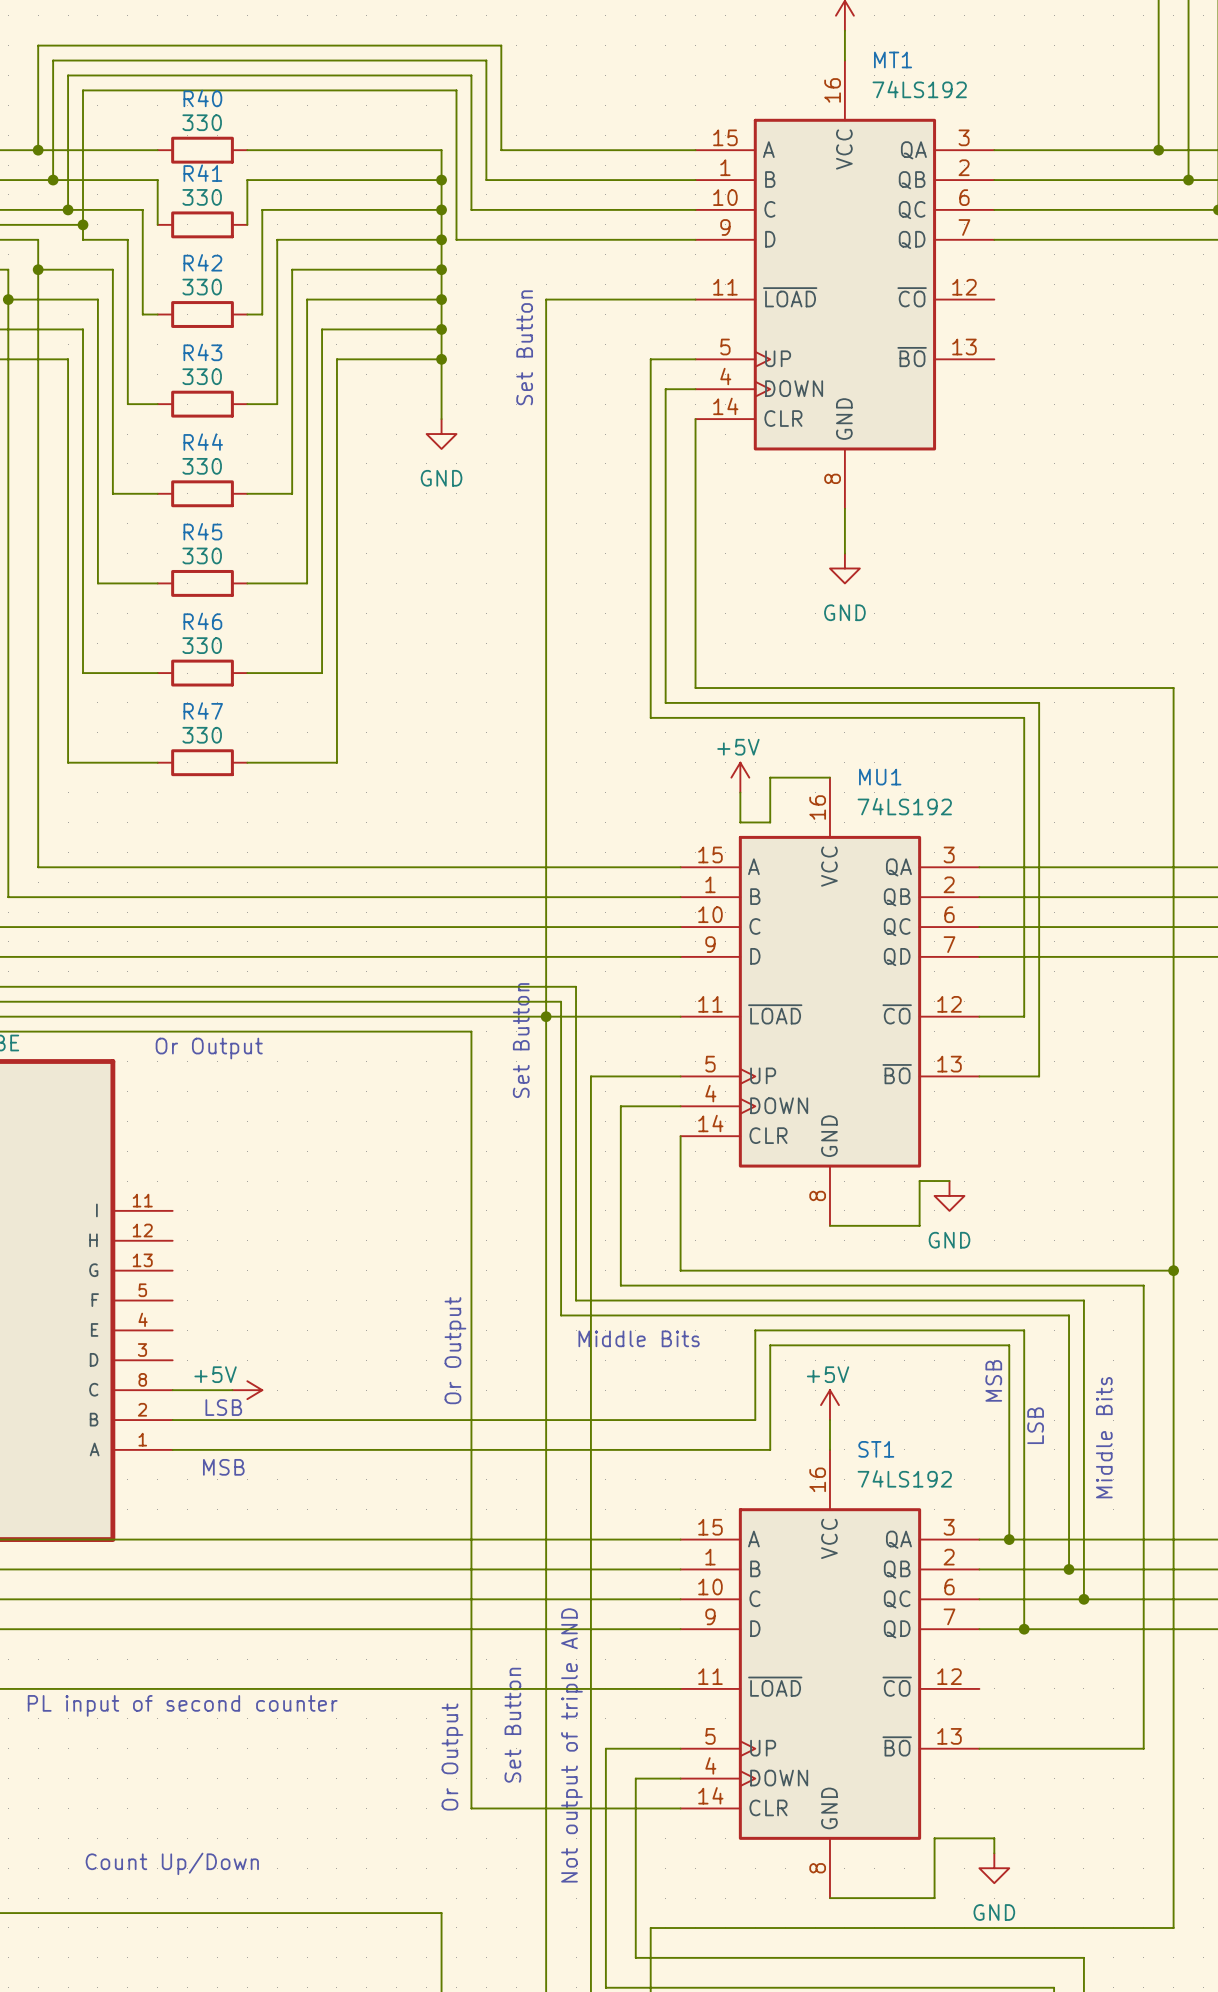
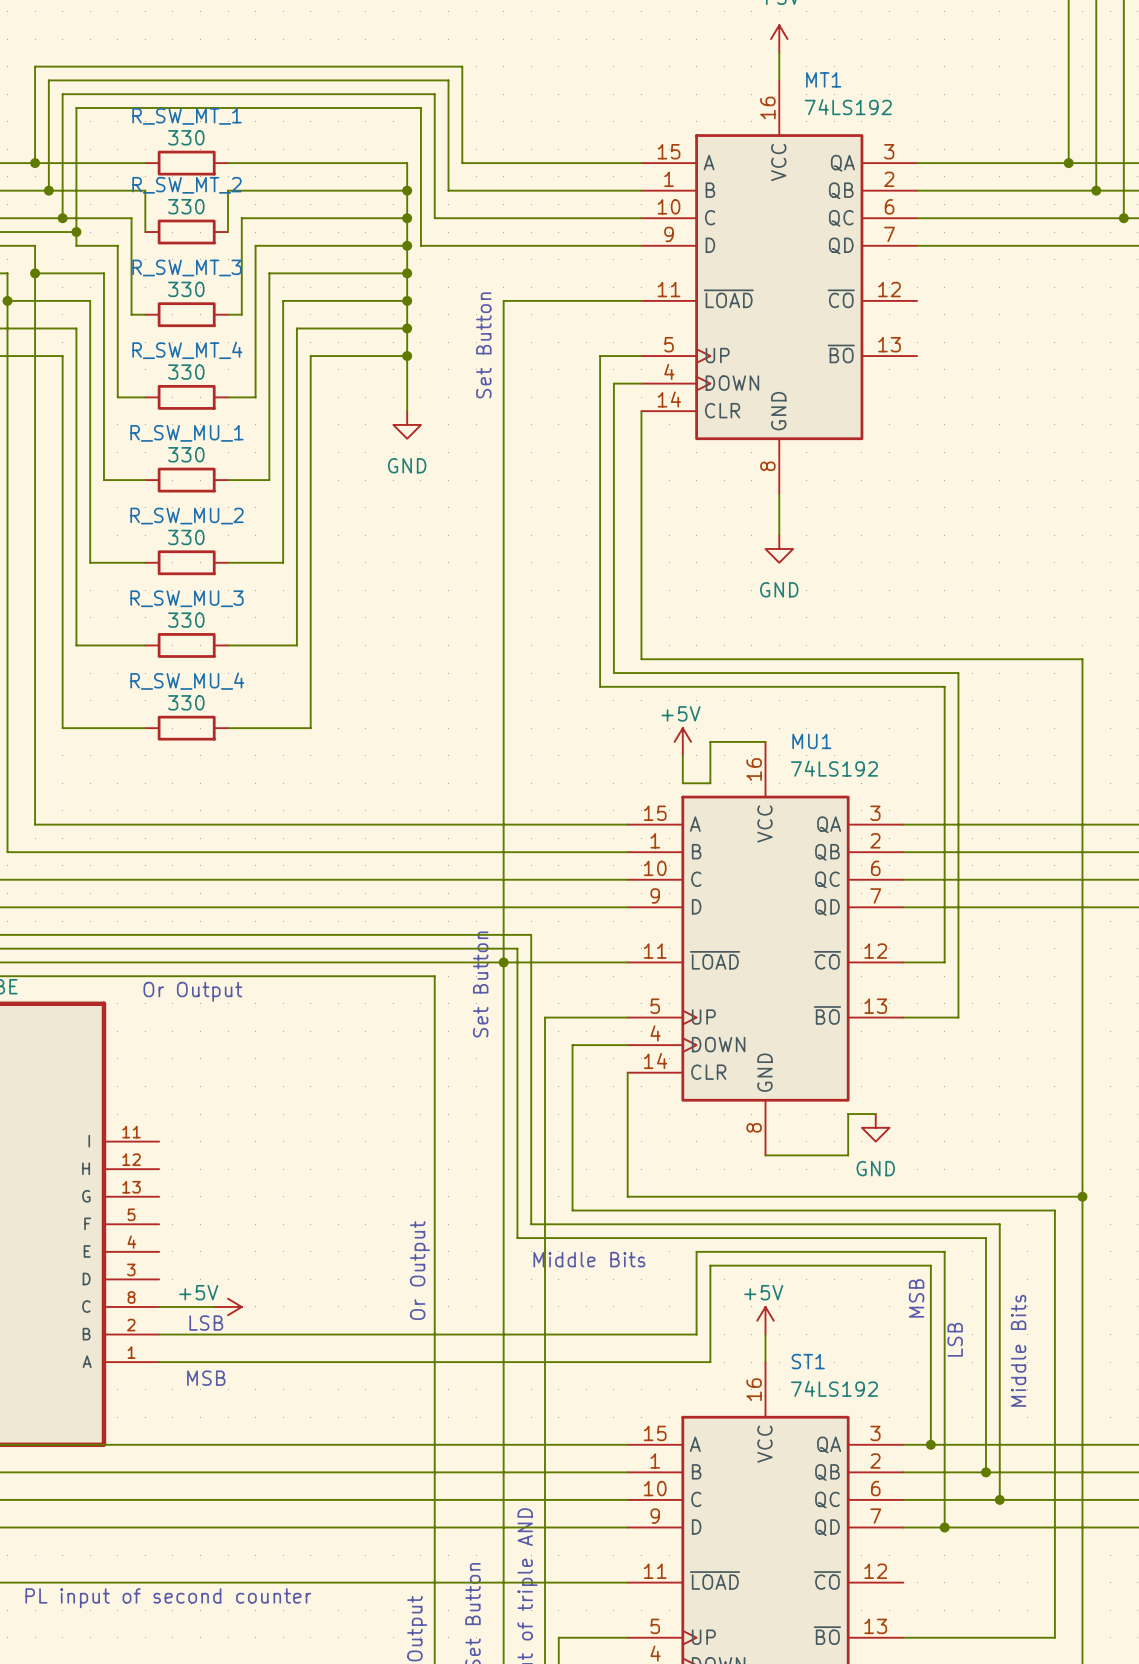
R40 name: R40 (202, 98) -> R_SW_MT_1 (186, 116)
R41 name: R41 (202, 173) -> R_SW_MT_2 (186, 185)
R42 name: R42 (202, 262) -> R_SW_MT_3 (186, 267)
R43 name: R43 (202, 352) -> R_SW_MT_4 (187, 350)
R44 name: R44 (203, 442) -> R_SW_MU_1 (186, 433)
R45 name: R45 (202, 531) -> R_SW_MU_2 (186, 516)
R46 name: R46 (202, 621) -> R_SW_MU_3 (186, 598)
R47 name: R47 (203, 710) -> R_SW_MU_4 (187, 681)

